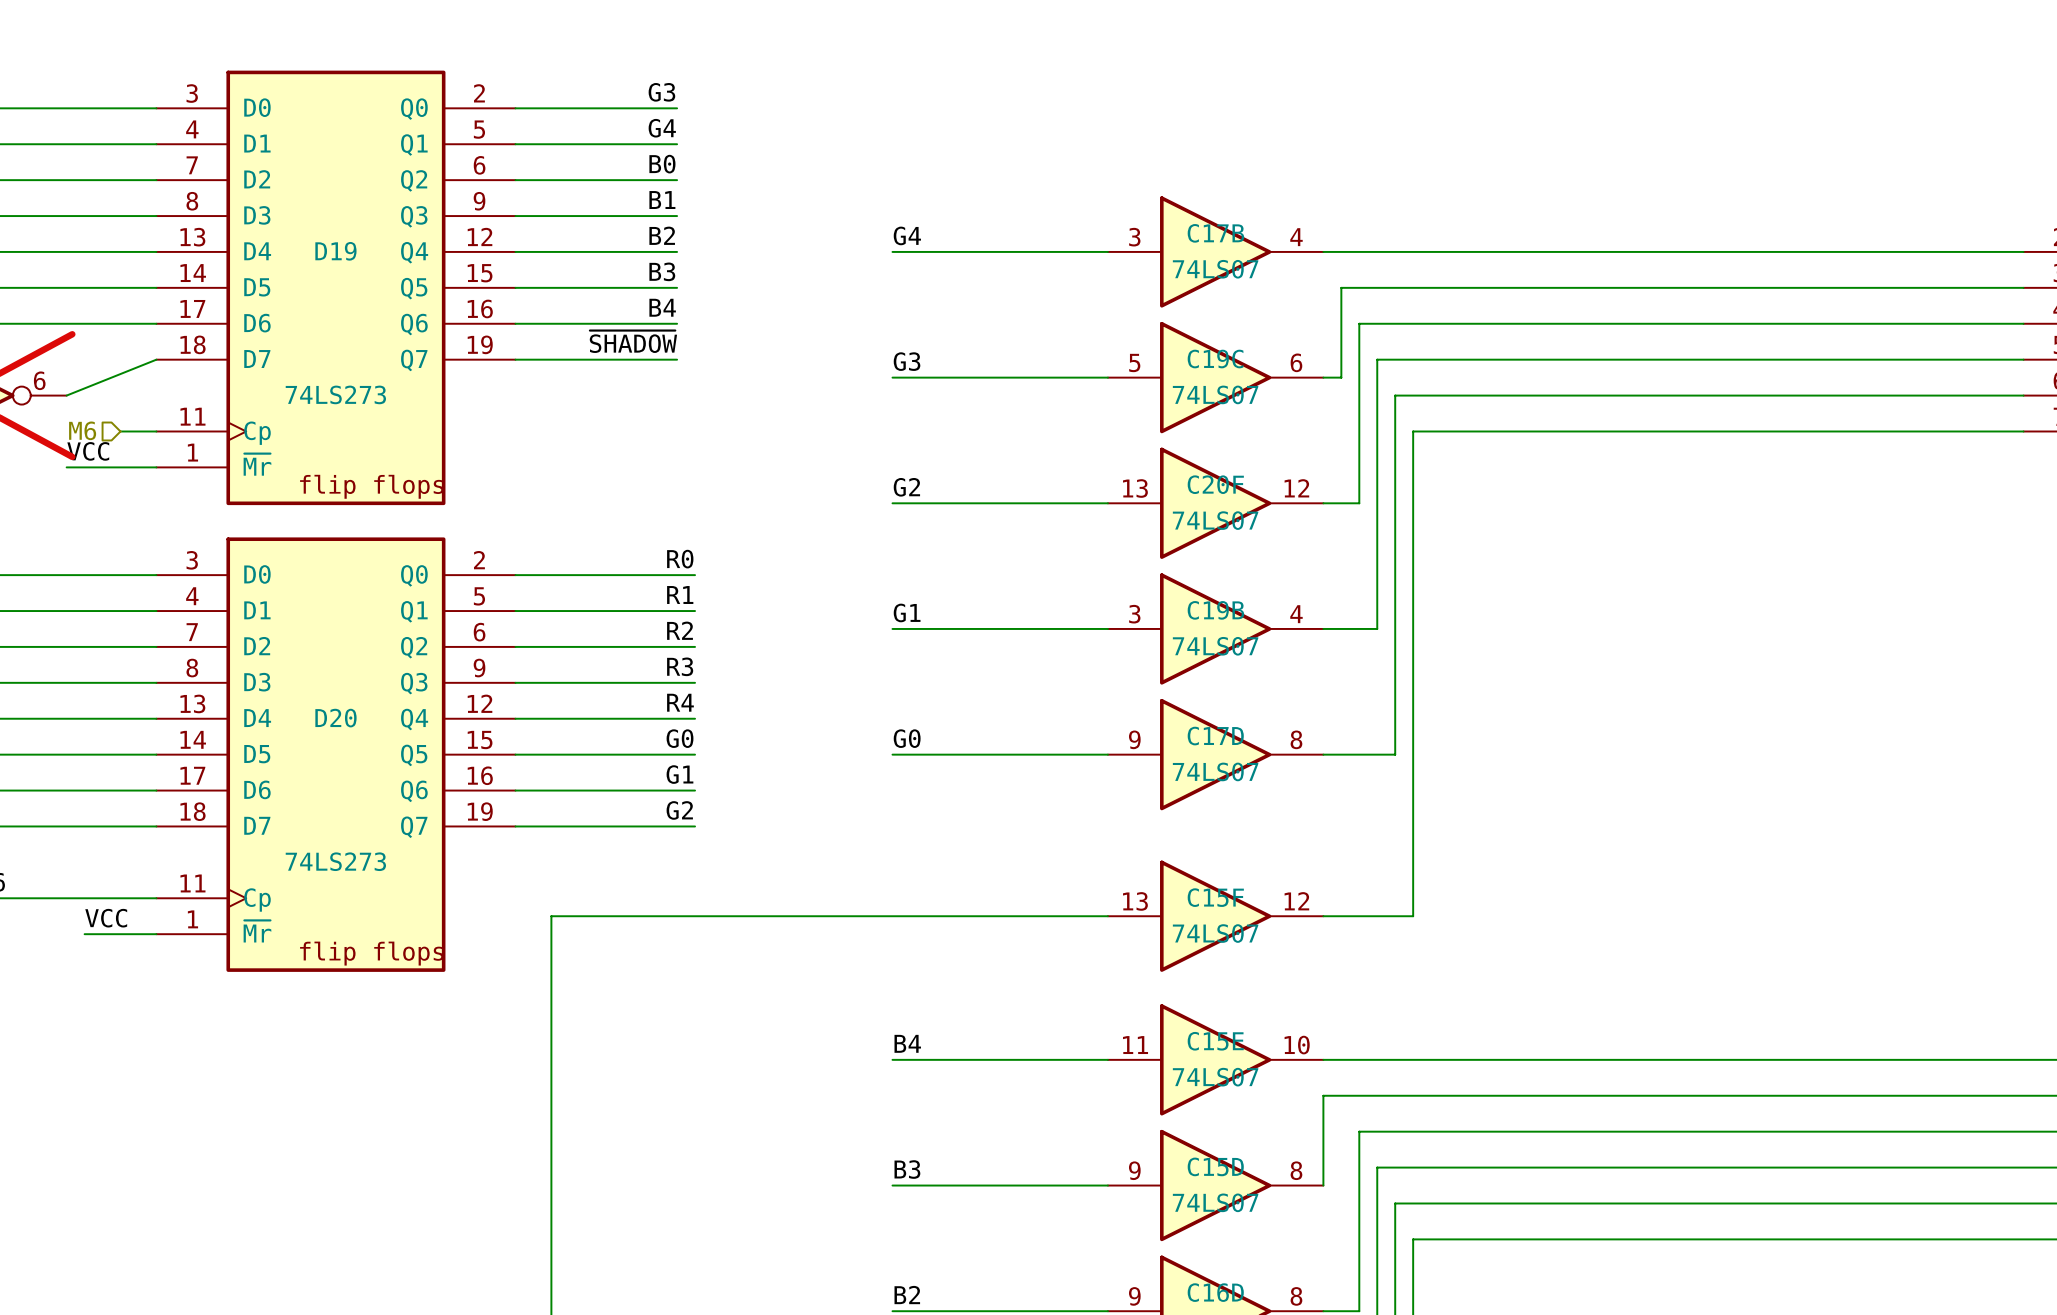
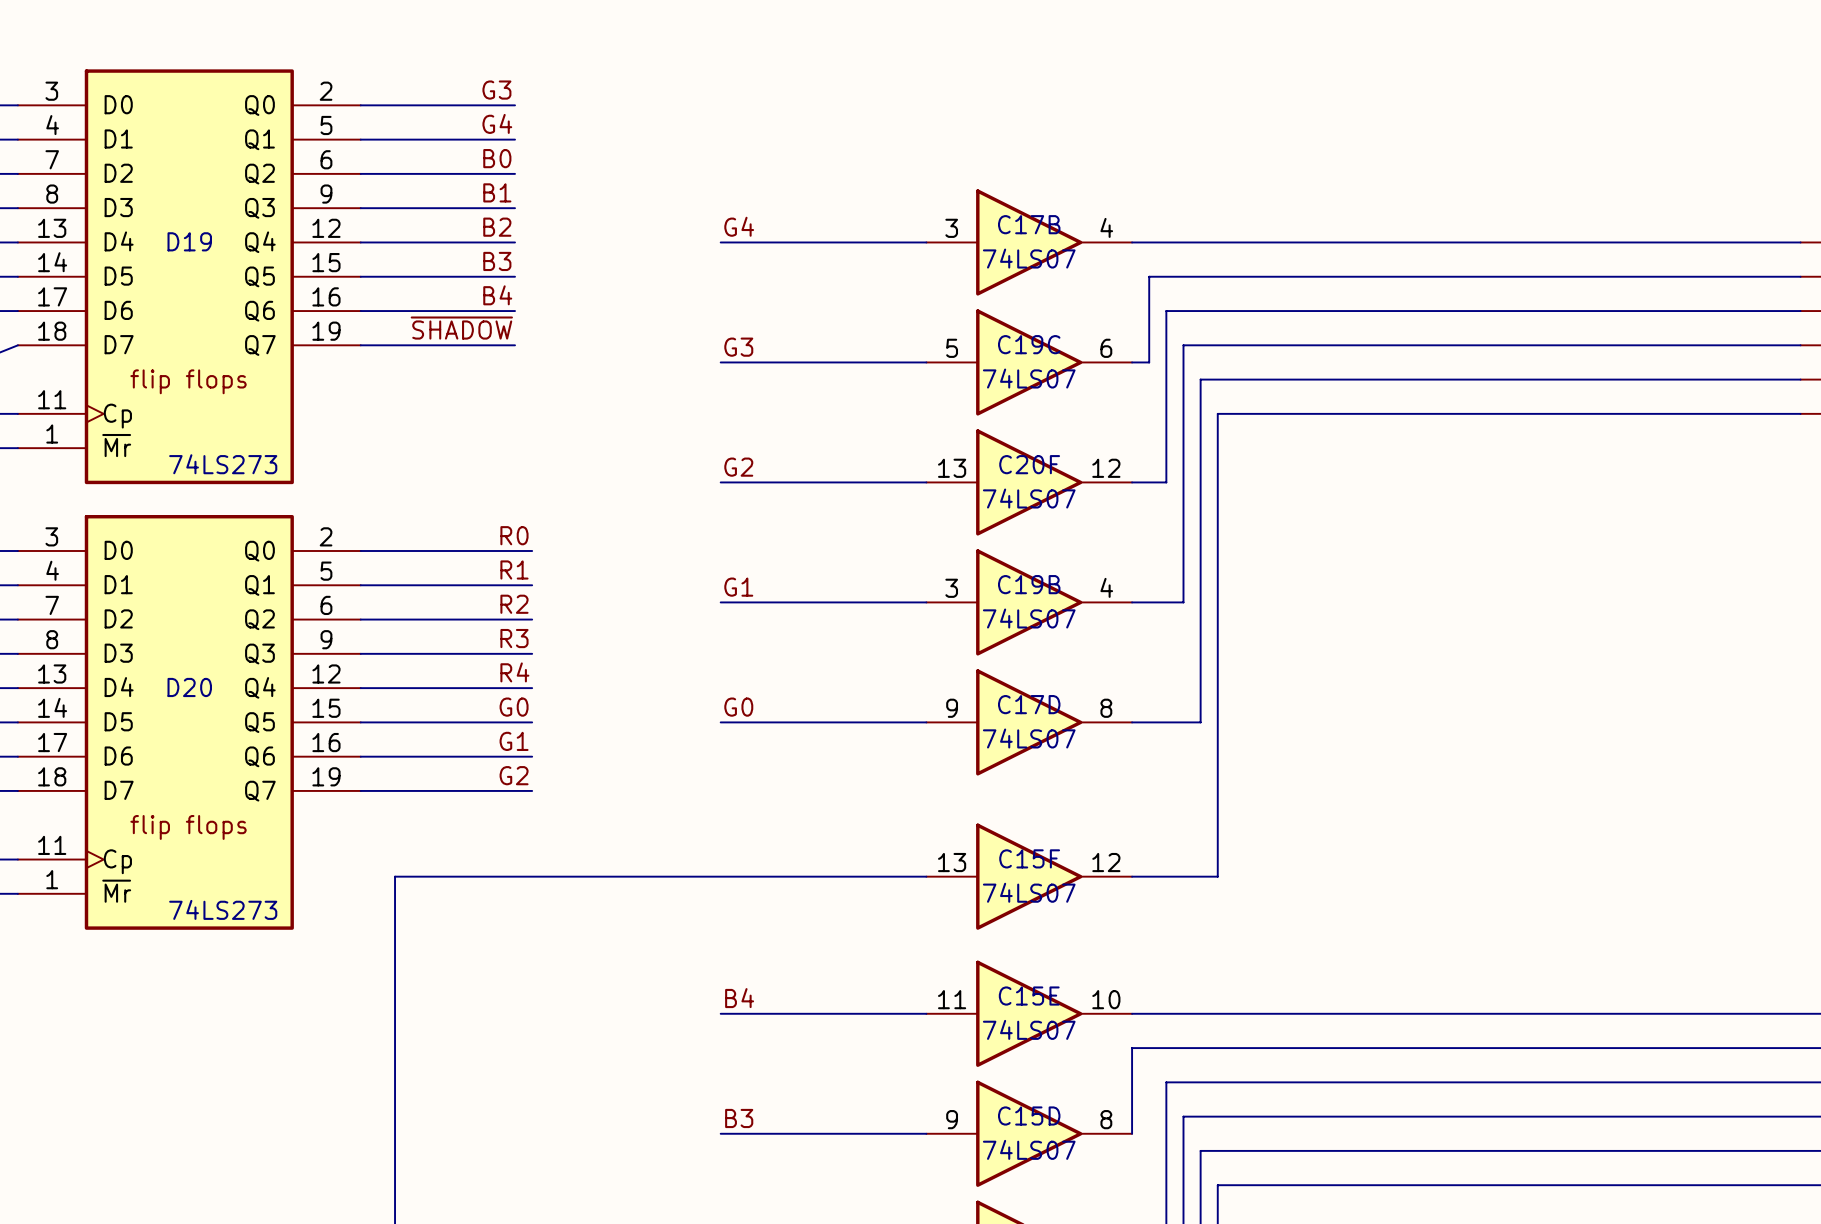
D19 value position: 74LS273 (335, 394) -> 74LS273 (223, 464)
D19 text position: flip flops (371, 486) -> flip flops (188, 381)
D20 value position: 74LS273 (335, 861) -> 74LS273 (223, 909)
D20 text position: flip flops (371, 953) -> flip flops (188, 827)

